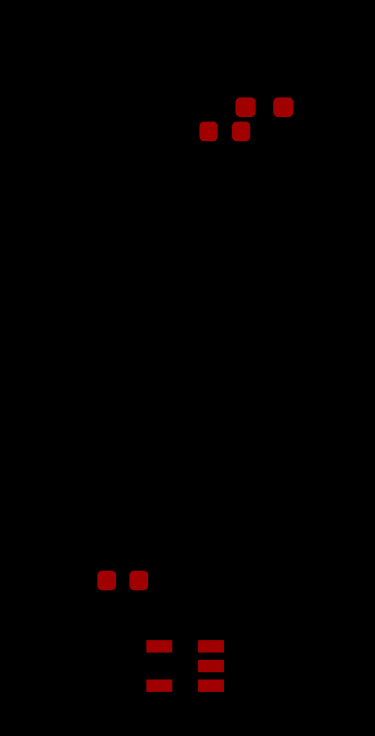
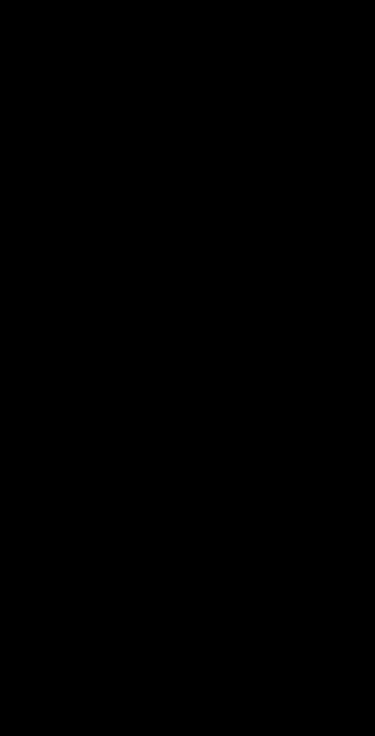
part: (264, 107) -> none
part: (224, 131) -> none
part: (122, 580) -> none
part: (185, 666) -> none

